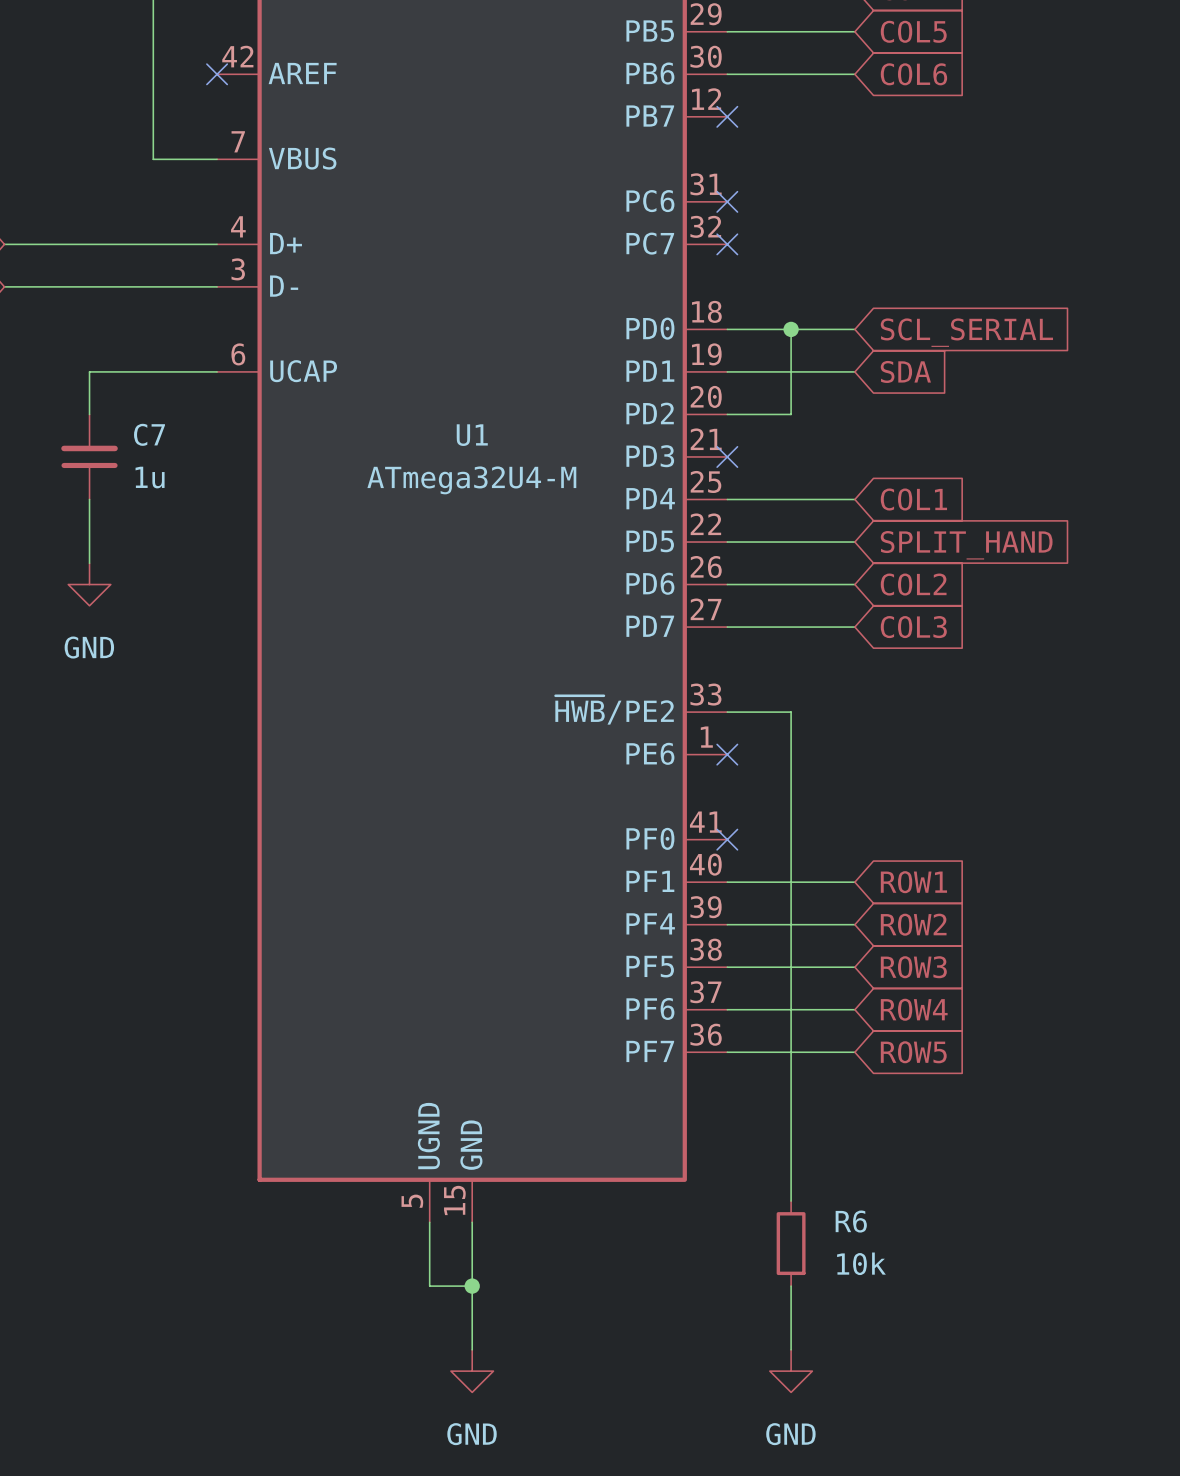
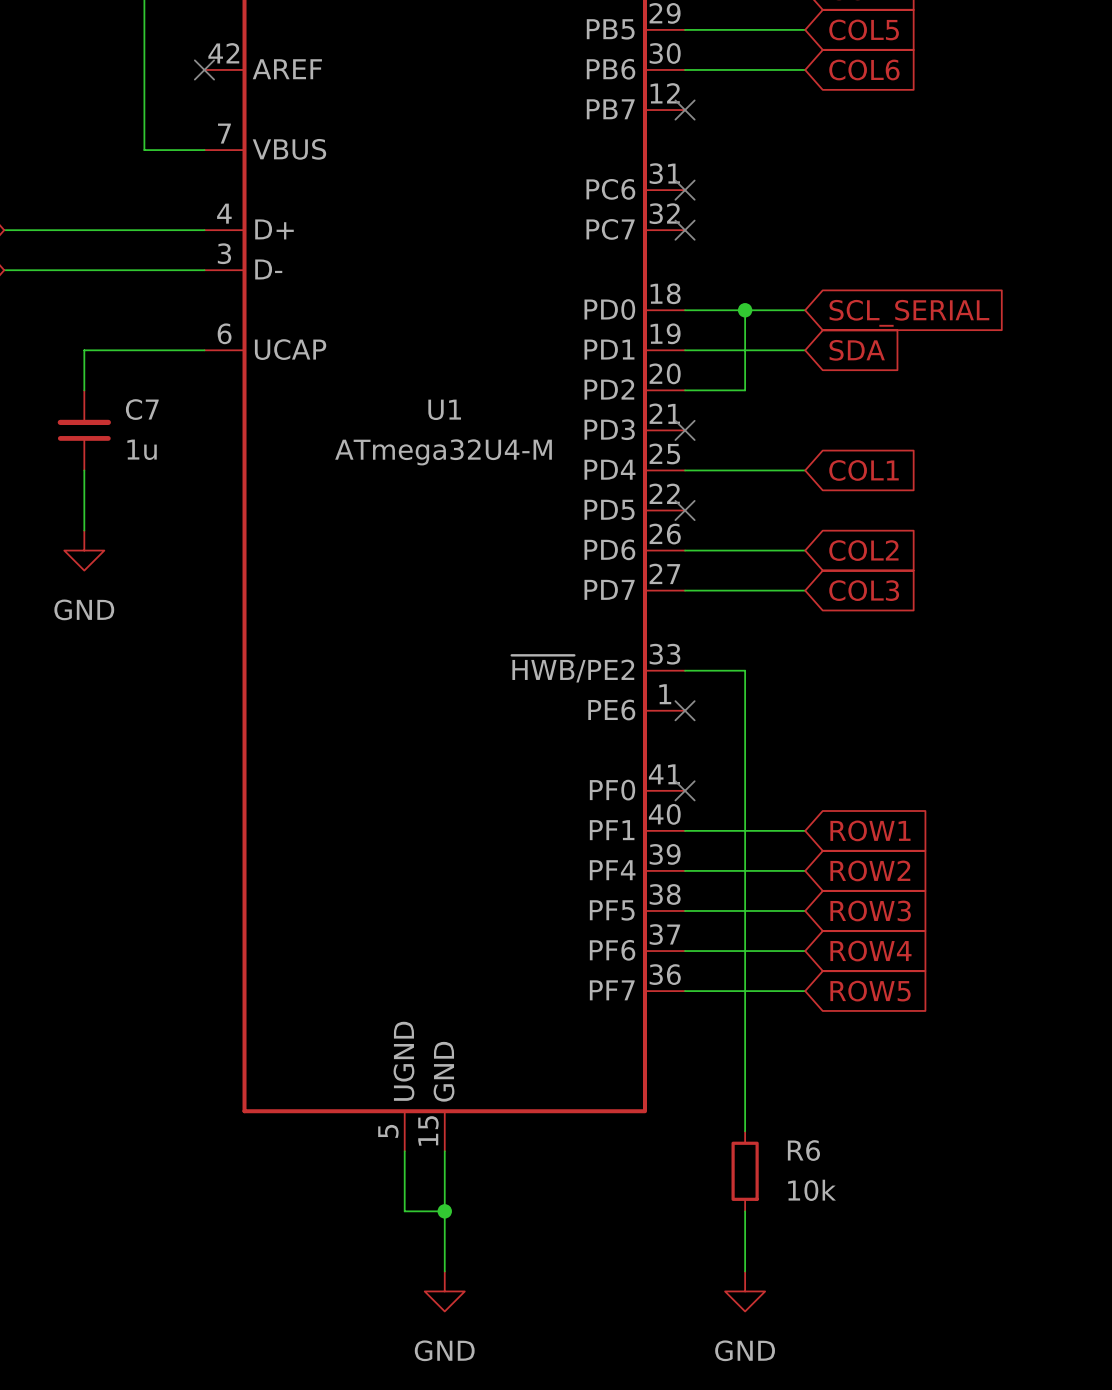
wire: (727, 542) (854, 542) -> none
no-connect mark: none -> (685, 510)
global label: SPLIT_HAND (966, 545) -> none

